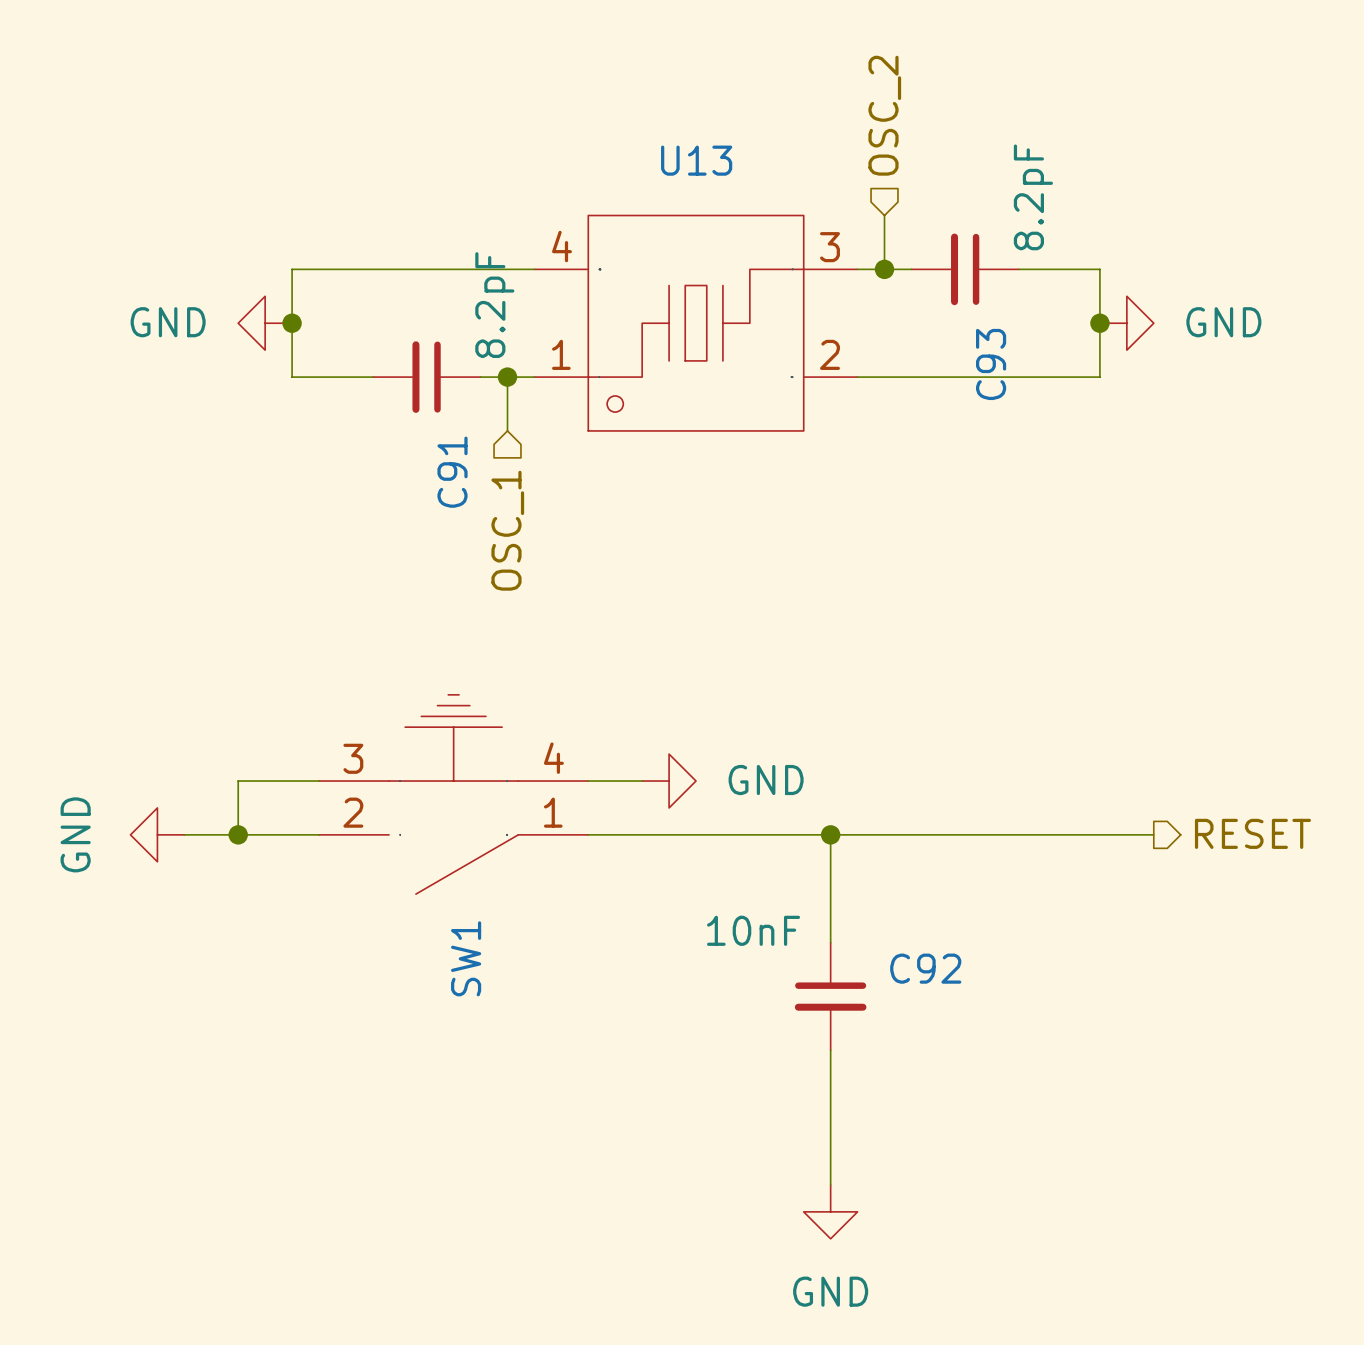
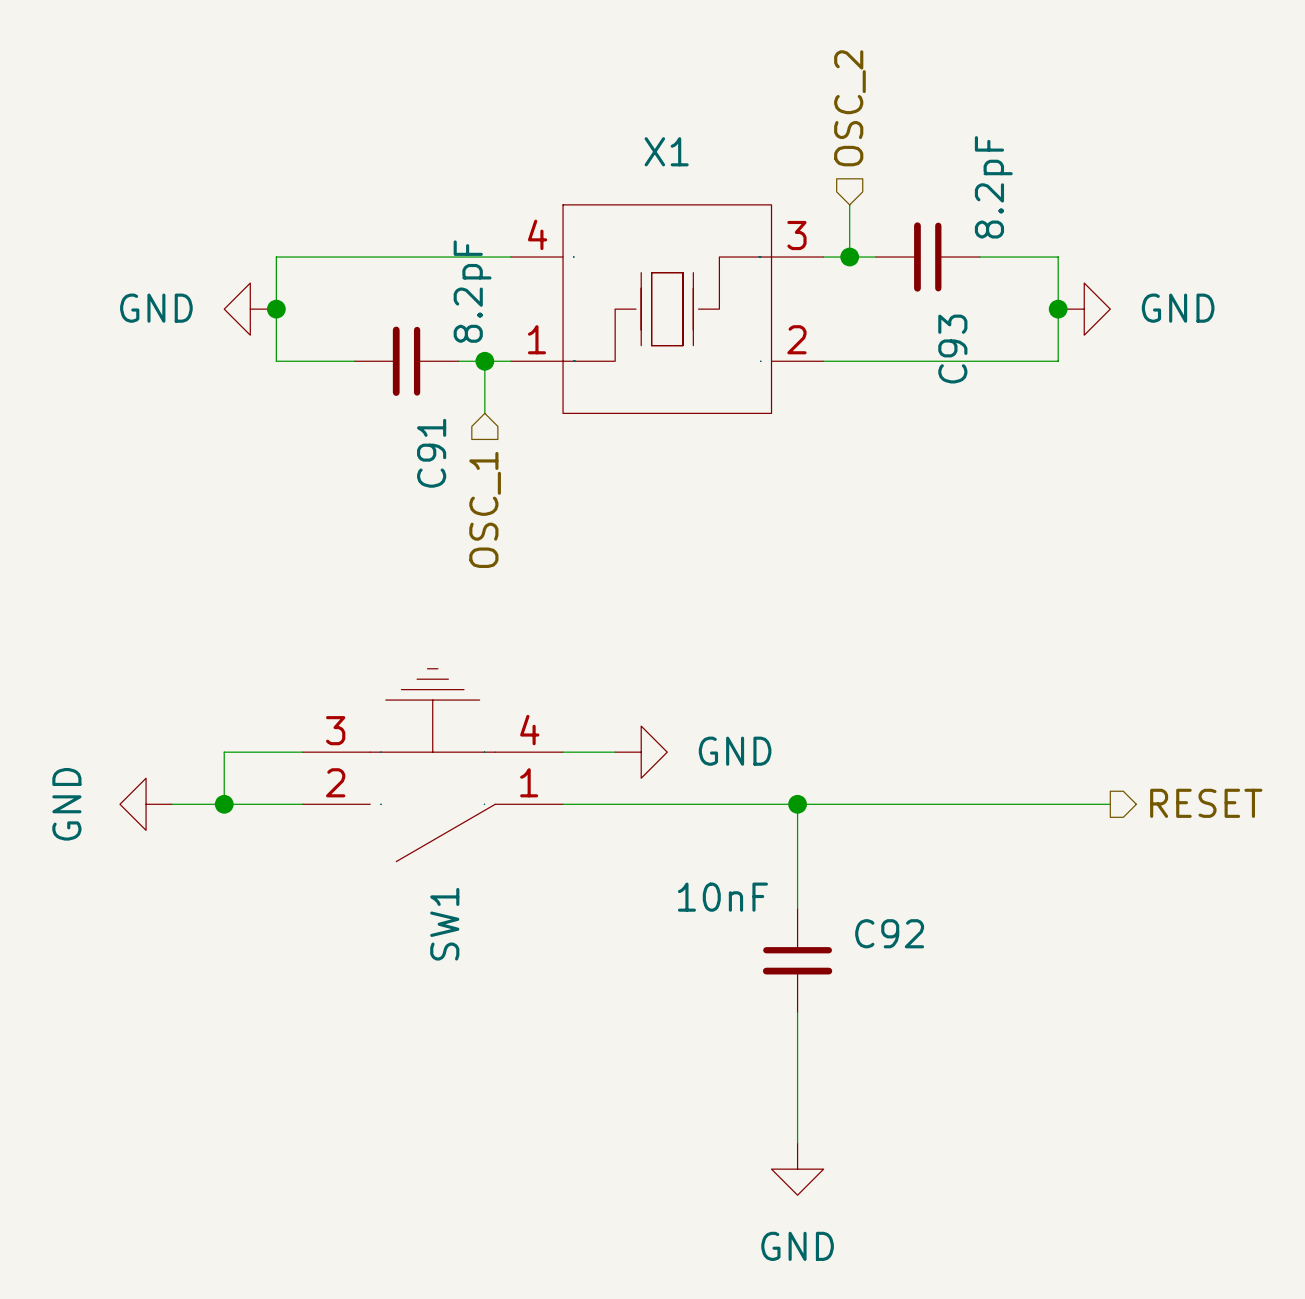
U13: (696, 323) -> none
X1: none -> (667, 309)

